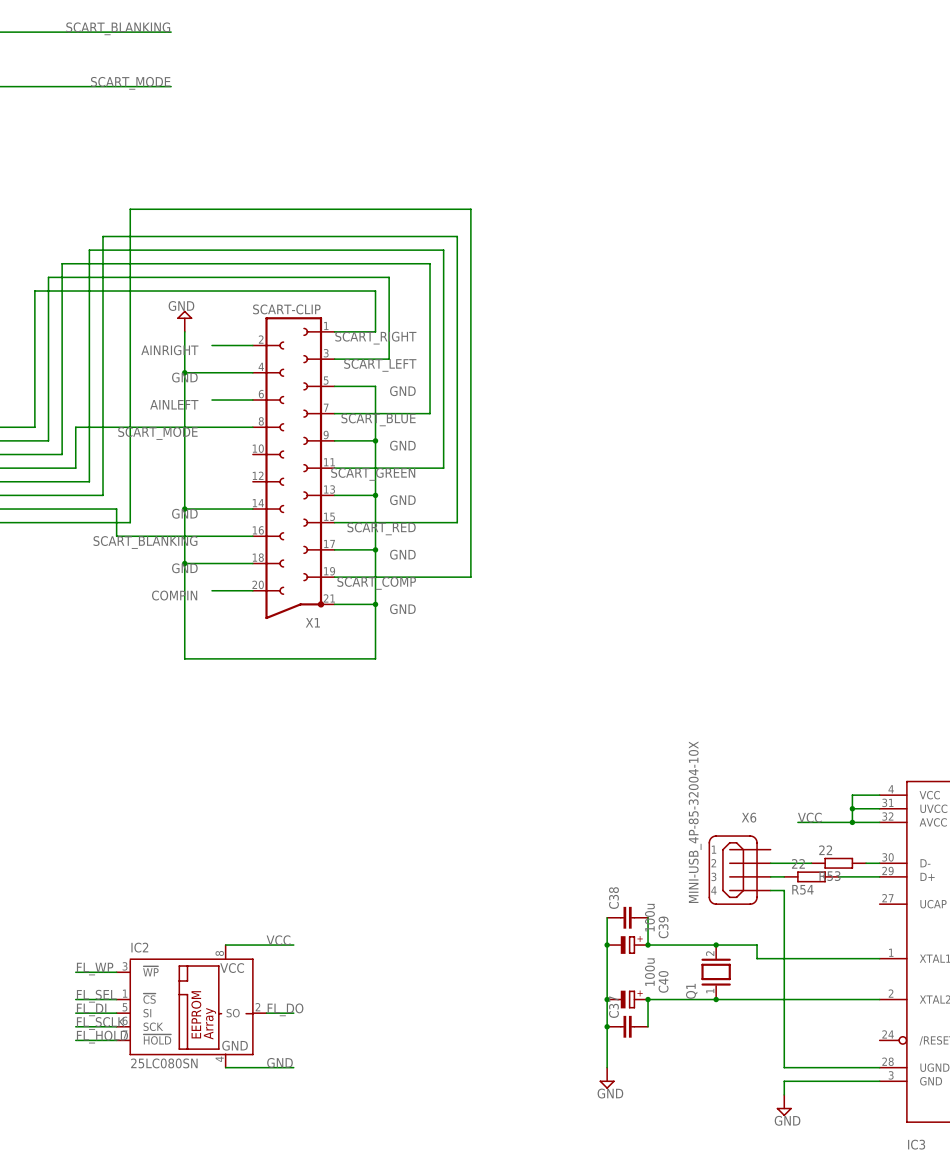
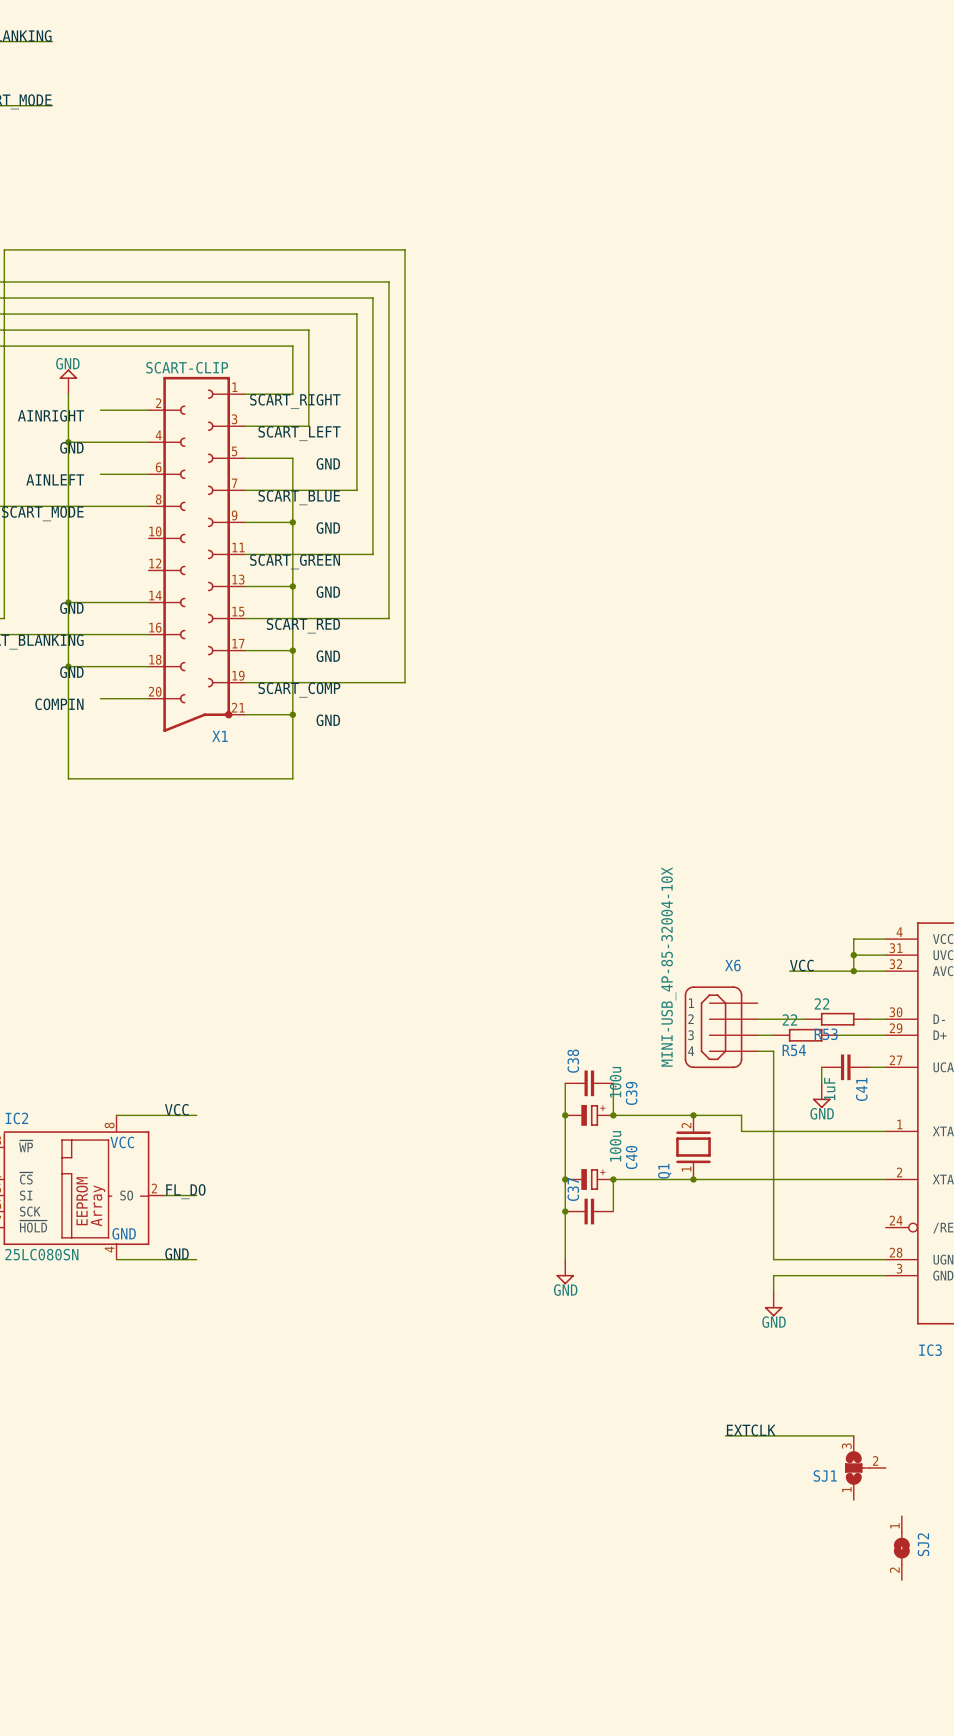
wire: none -> (821, 1067) (821, 1083)
C41: none -> 1uF (845, 1067)
wire: none -> (869, 1067) (885, 1067)
power symbol: none -> GND (821, 1095)

